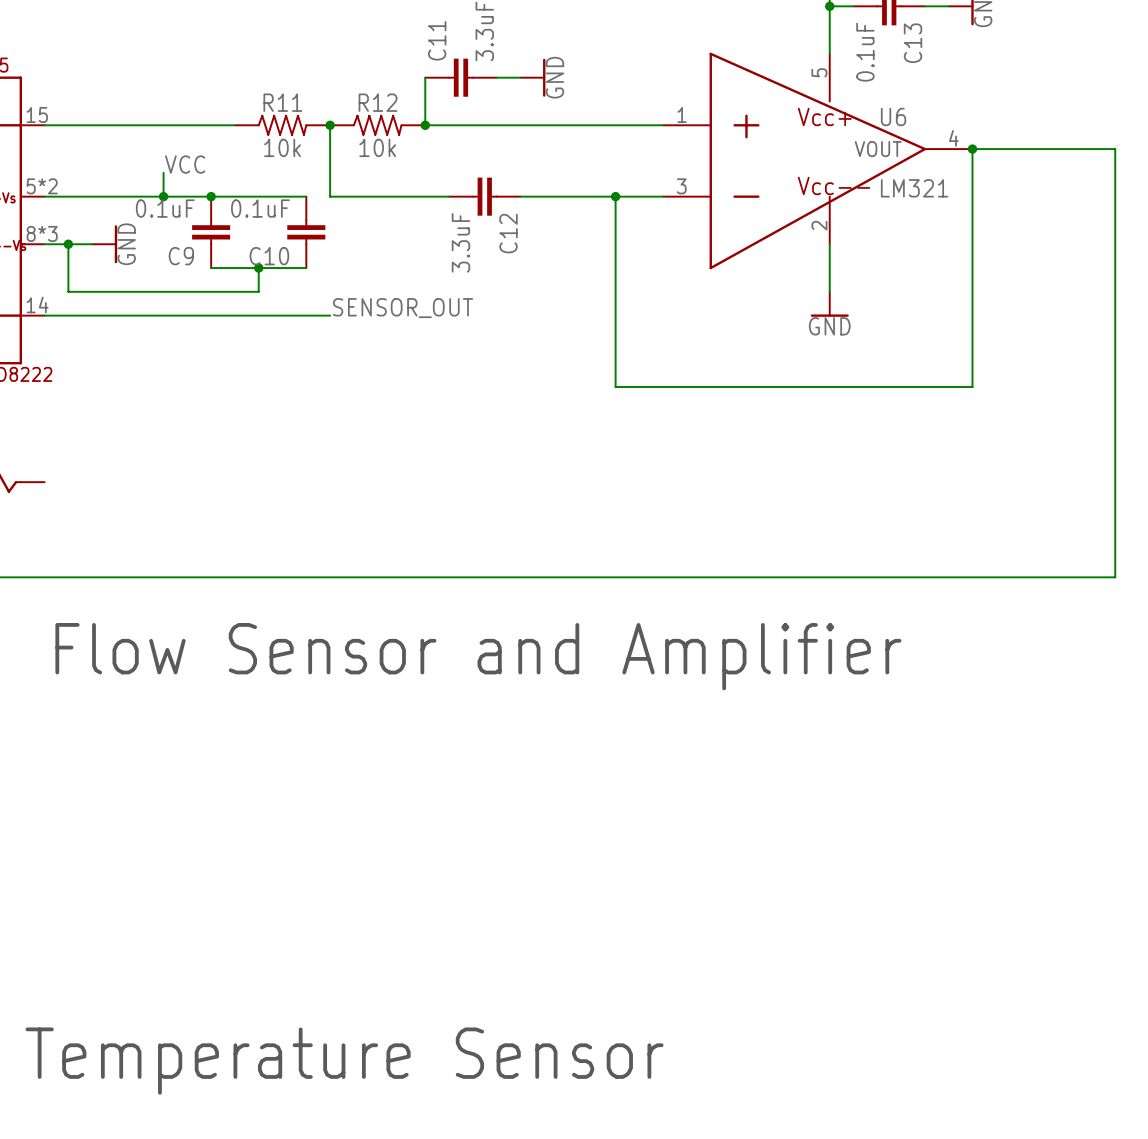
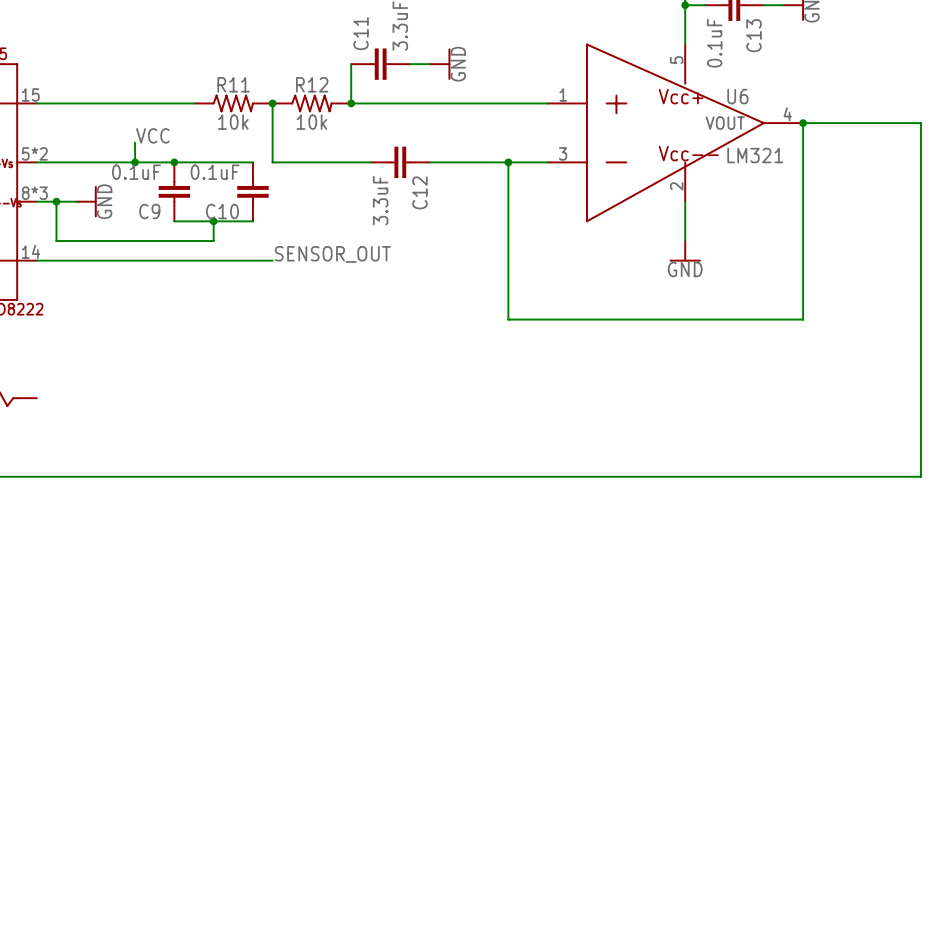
text: Flow Sensor and Amplifier (478, 656) -> none
text: Temperature Sensor (344, 1061) -> none

